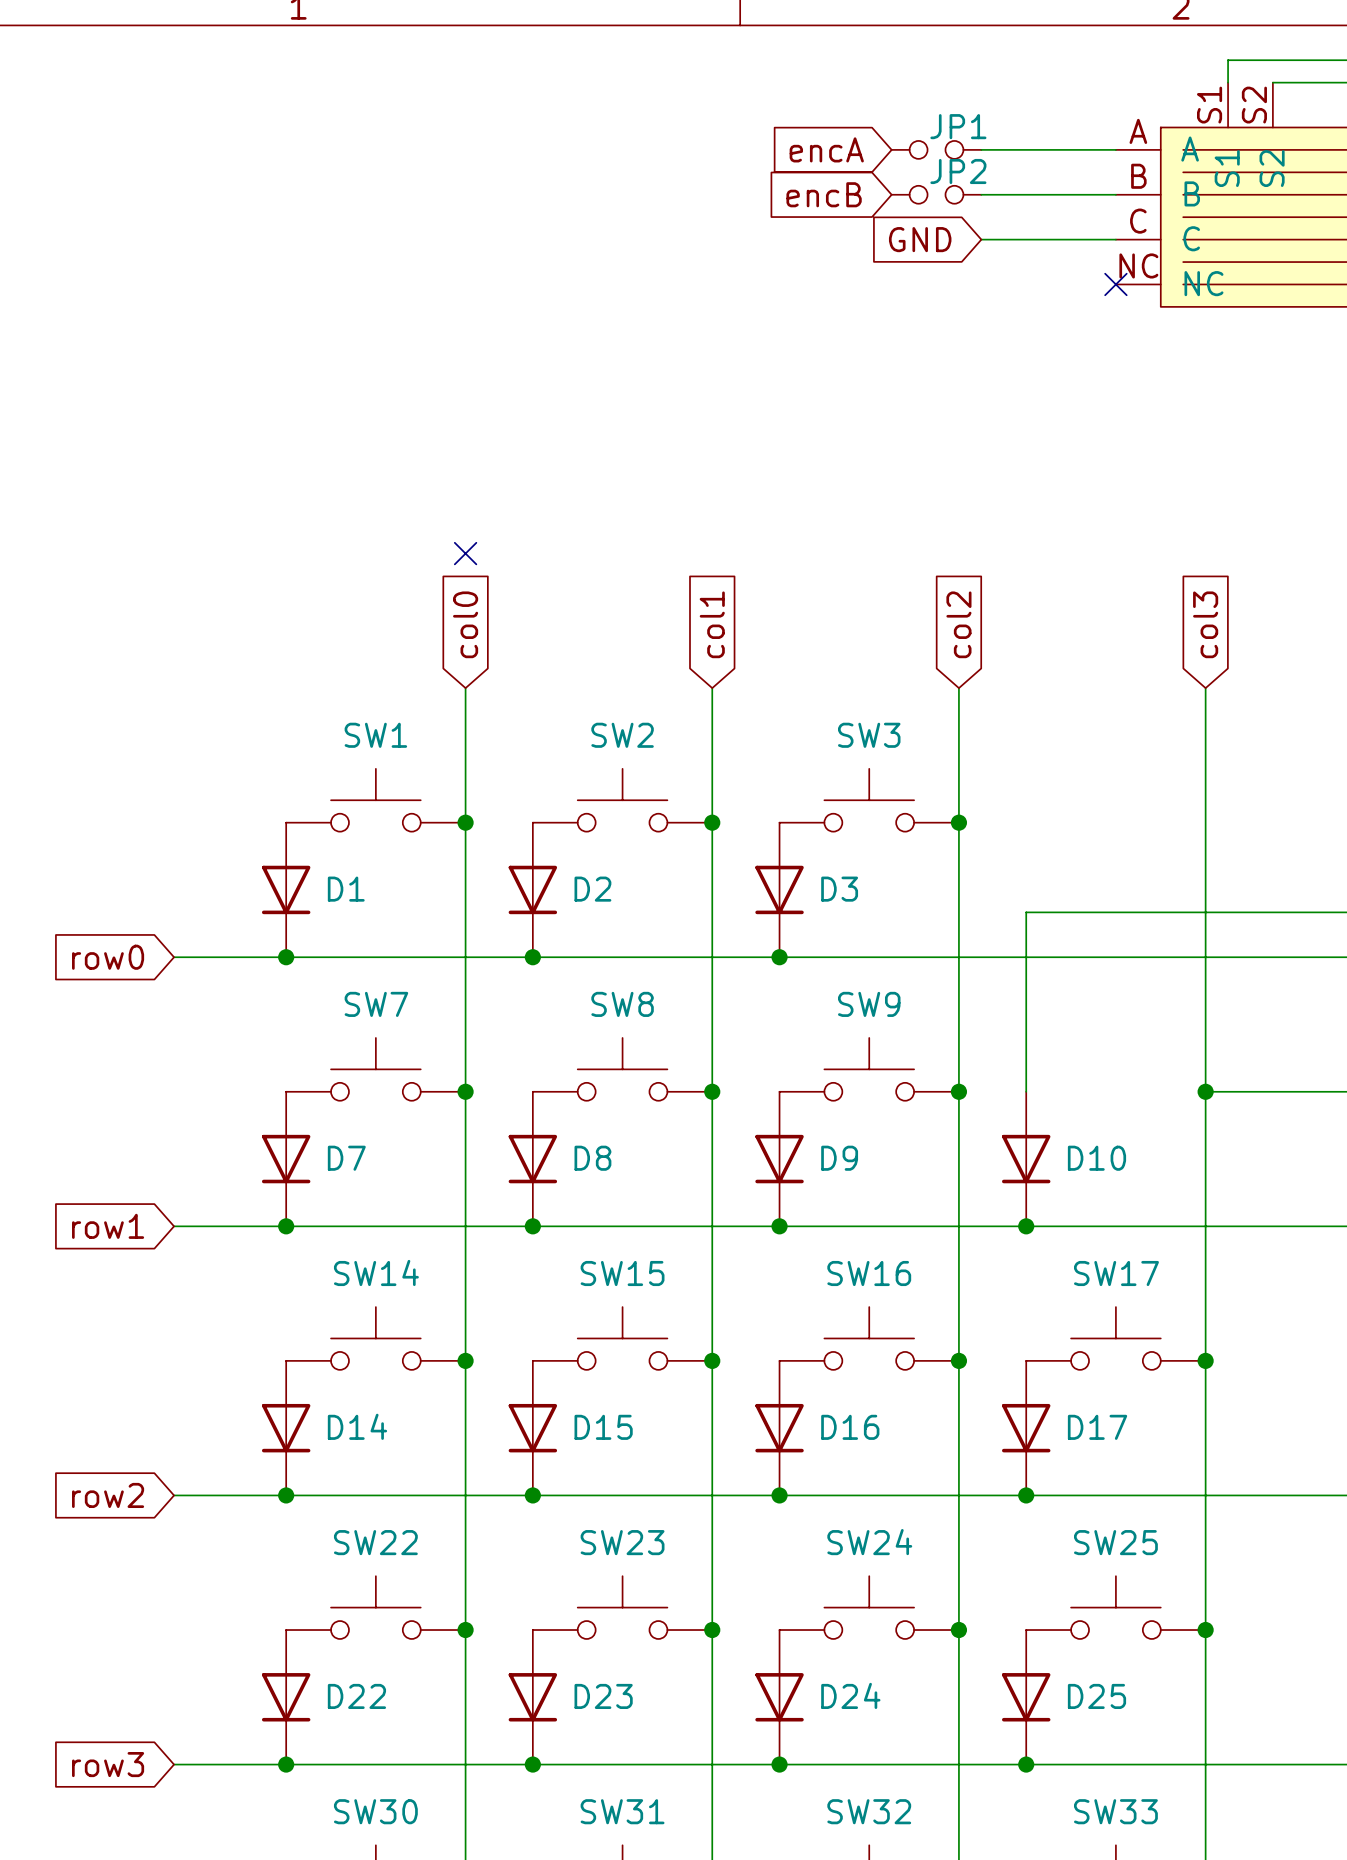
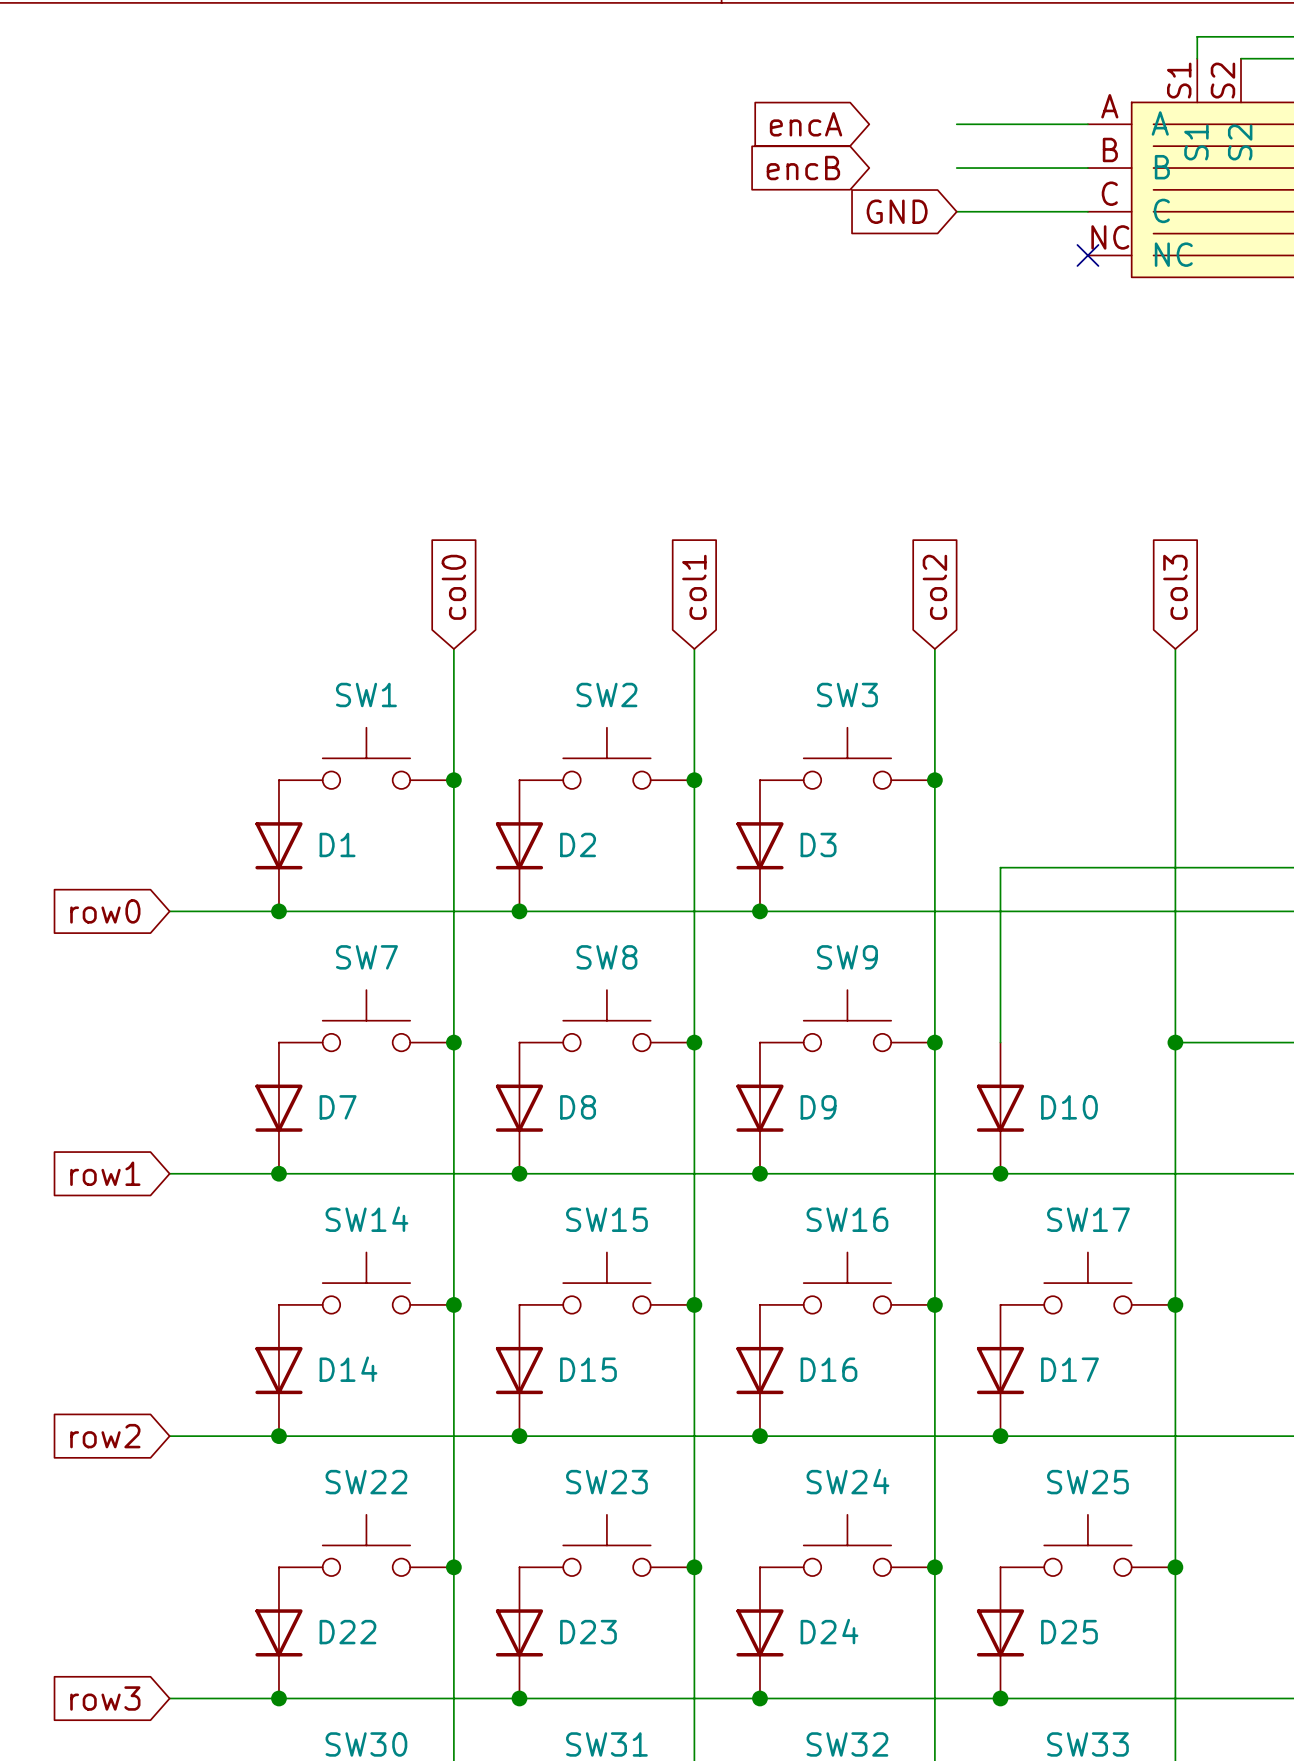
JP1: (936, 149) -> none
JP2: (936, 194) -> none
no-connect mark: (465, 553) -> none

